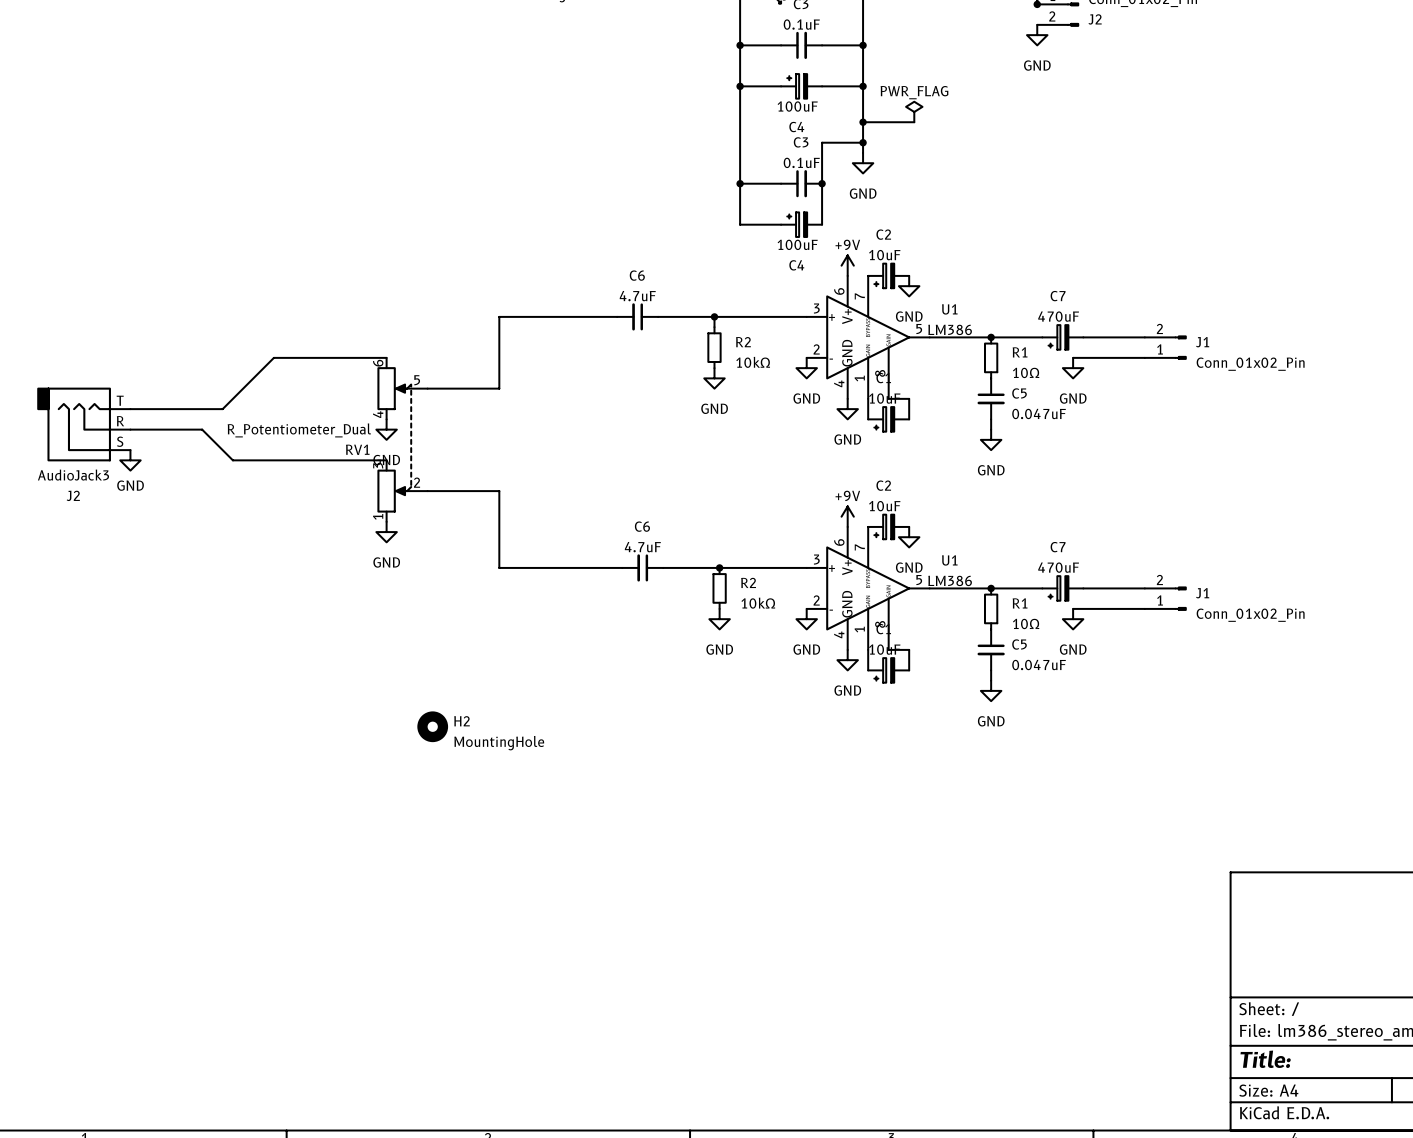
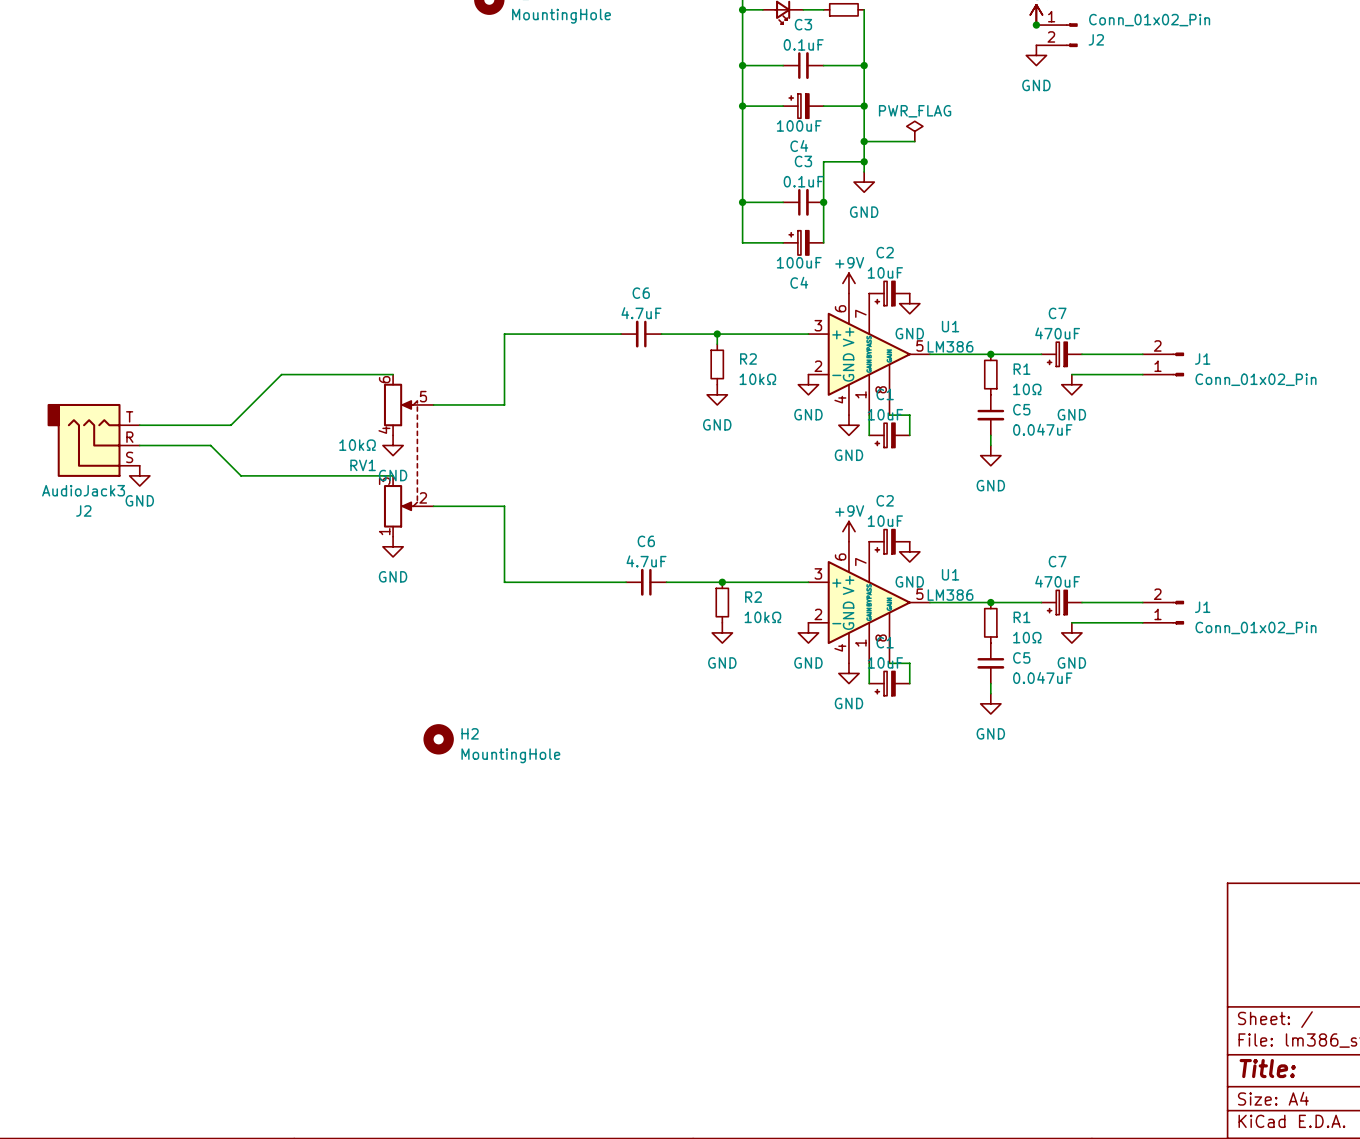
RV1 value: R_Potentiometer_Dual (299, 430) -> 10kΩ (357, 445)

